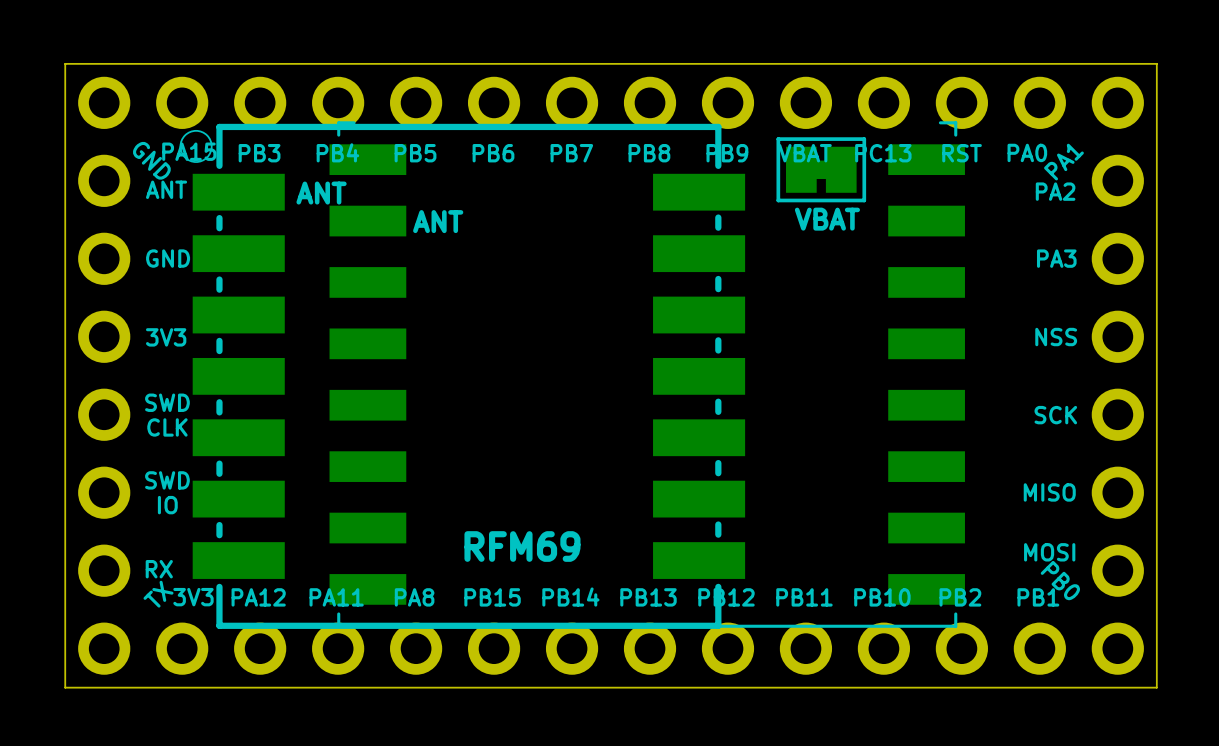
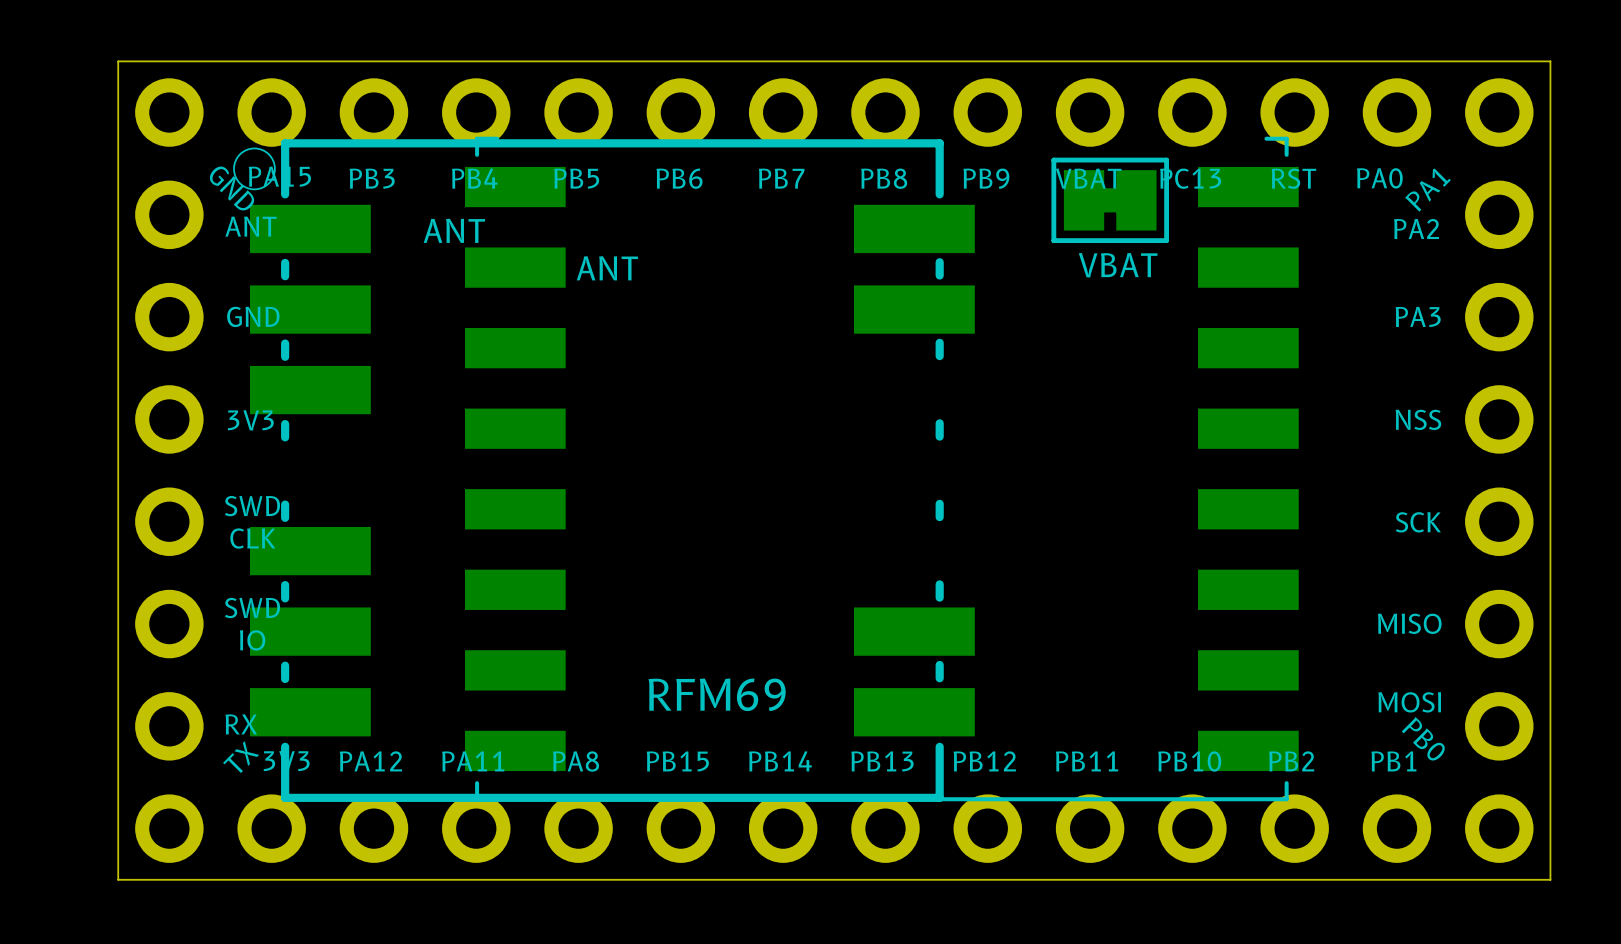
part footprint: [180, 123, 746, 629] -> [233, 139, 975, 802]

